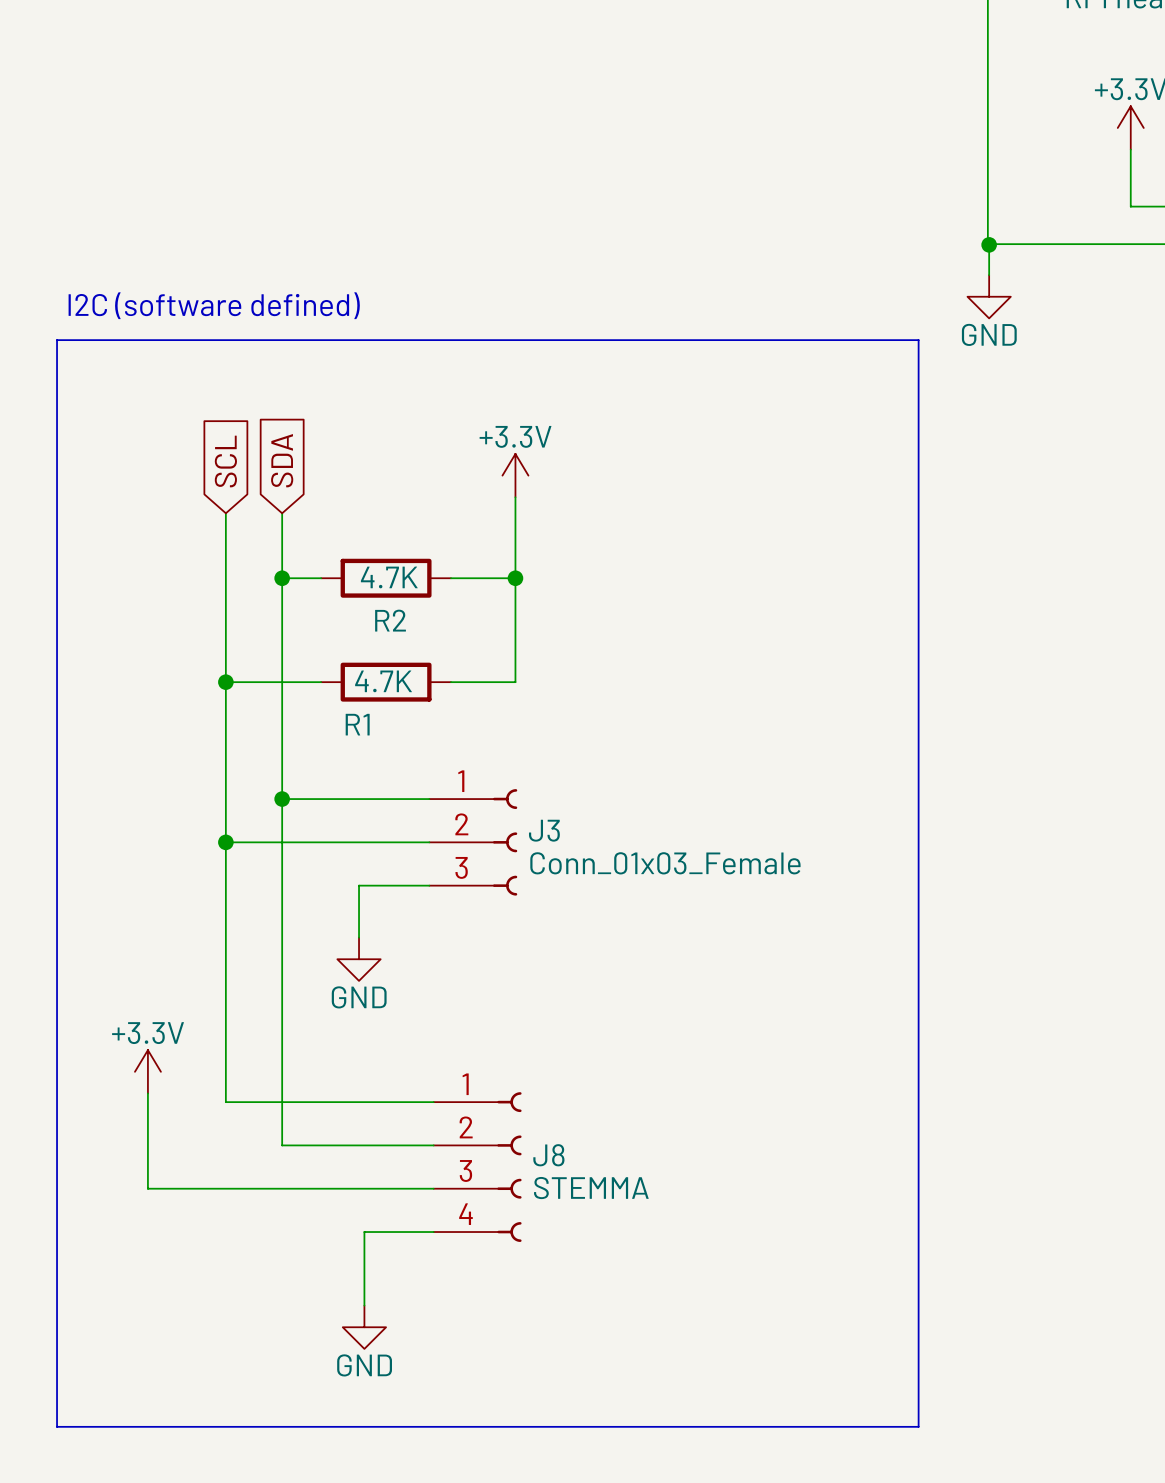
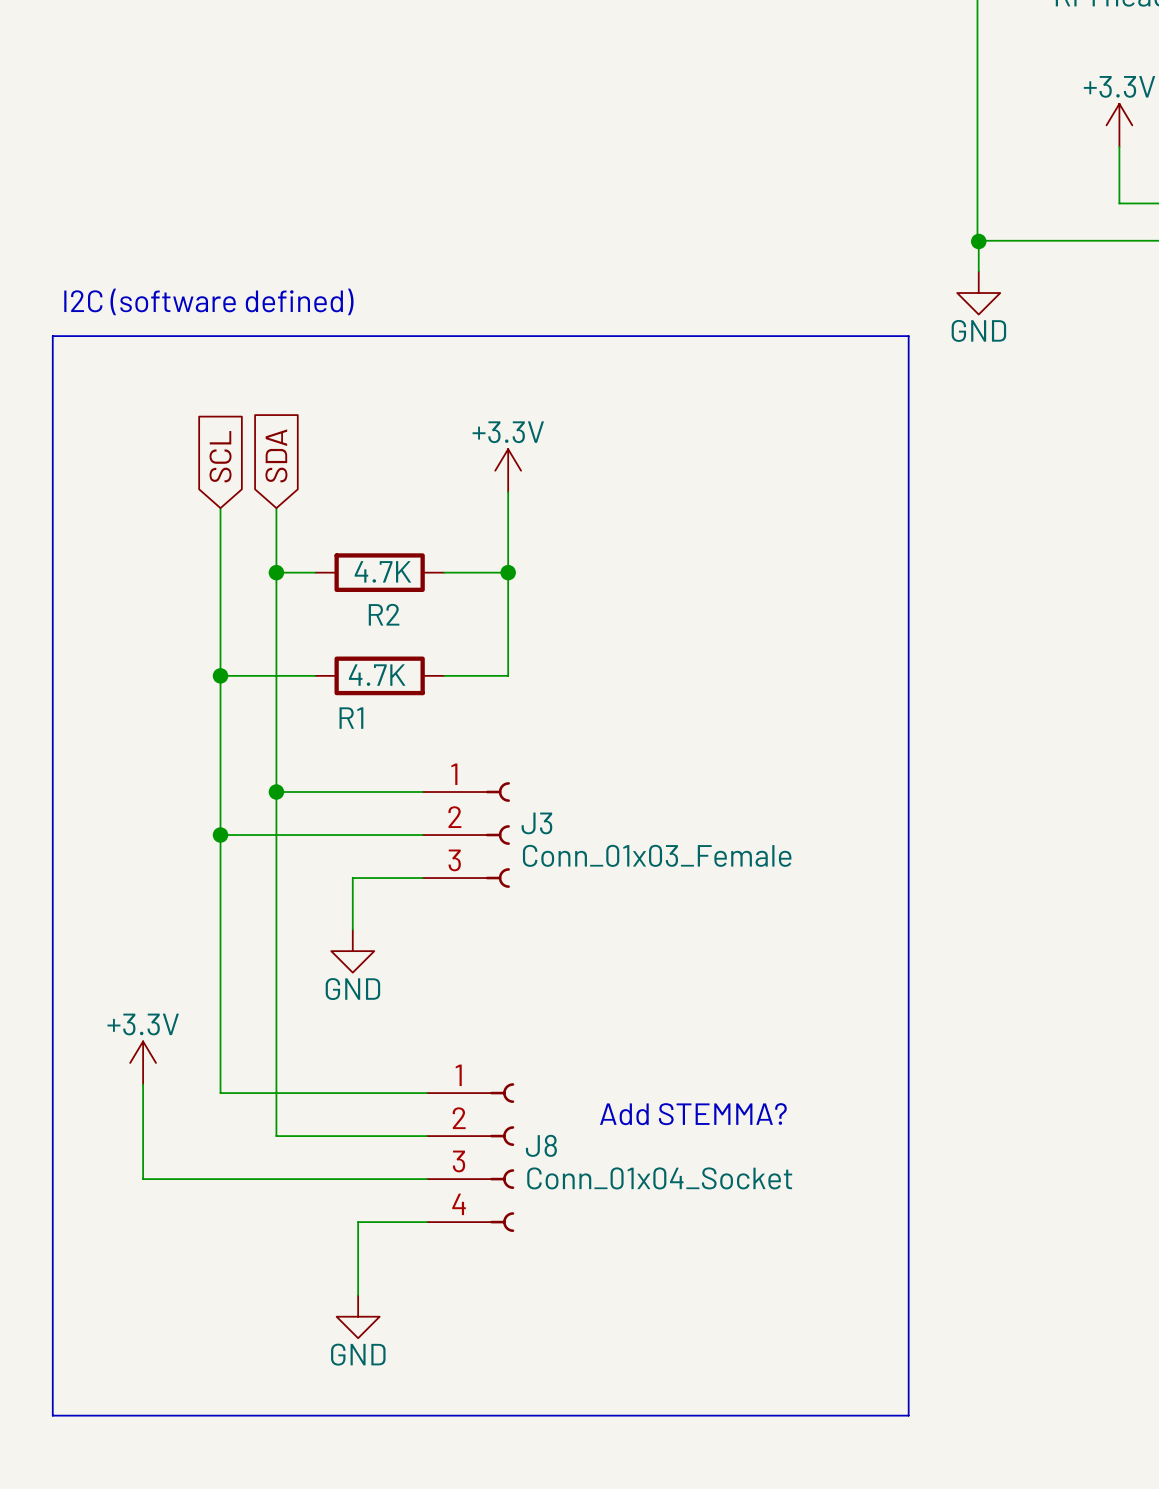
text: none -> Add STEMMA? (693, 1114)
J8 value: STEMMA (591, 1188) -> Conn_01x04_Socket (659, 1178)

